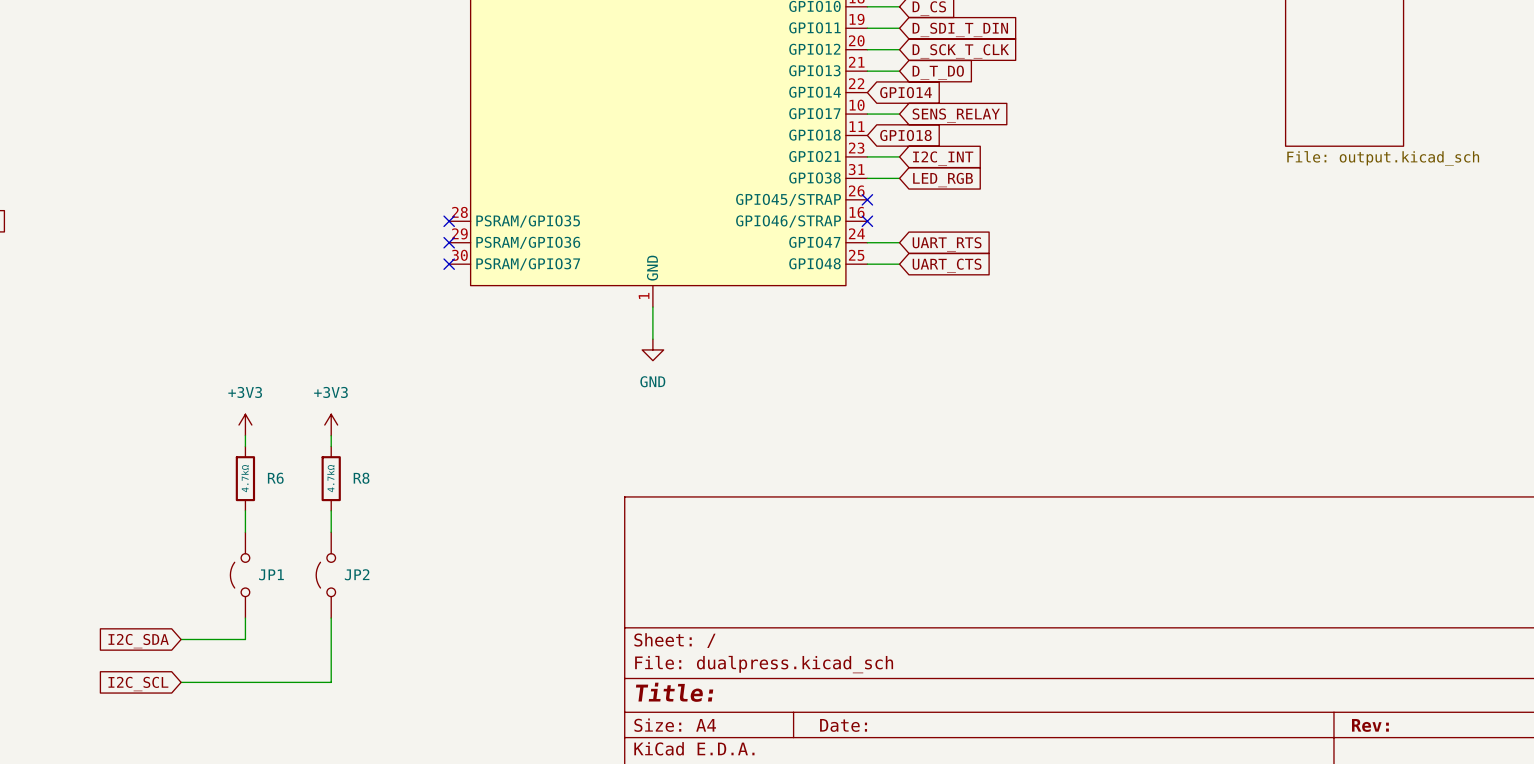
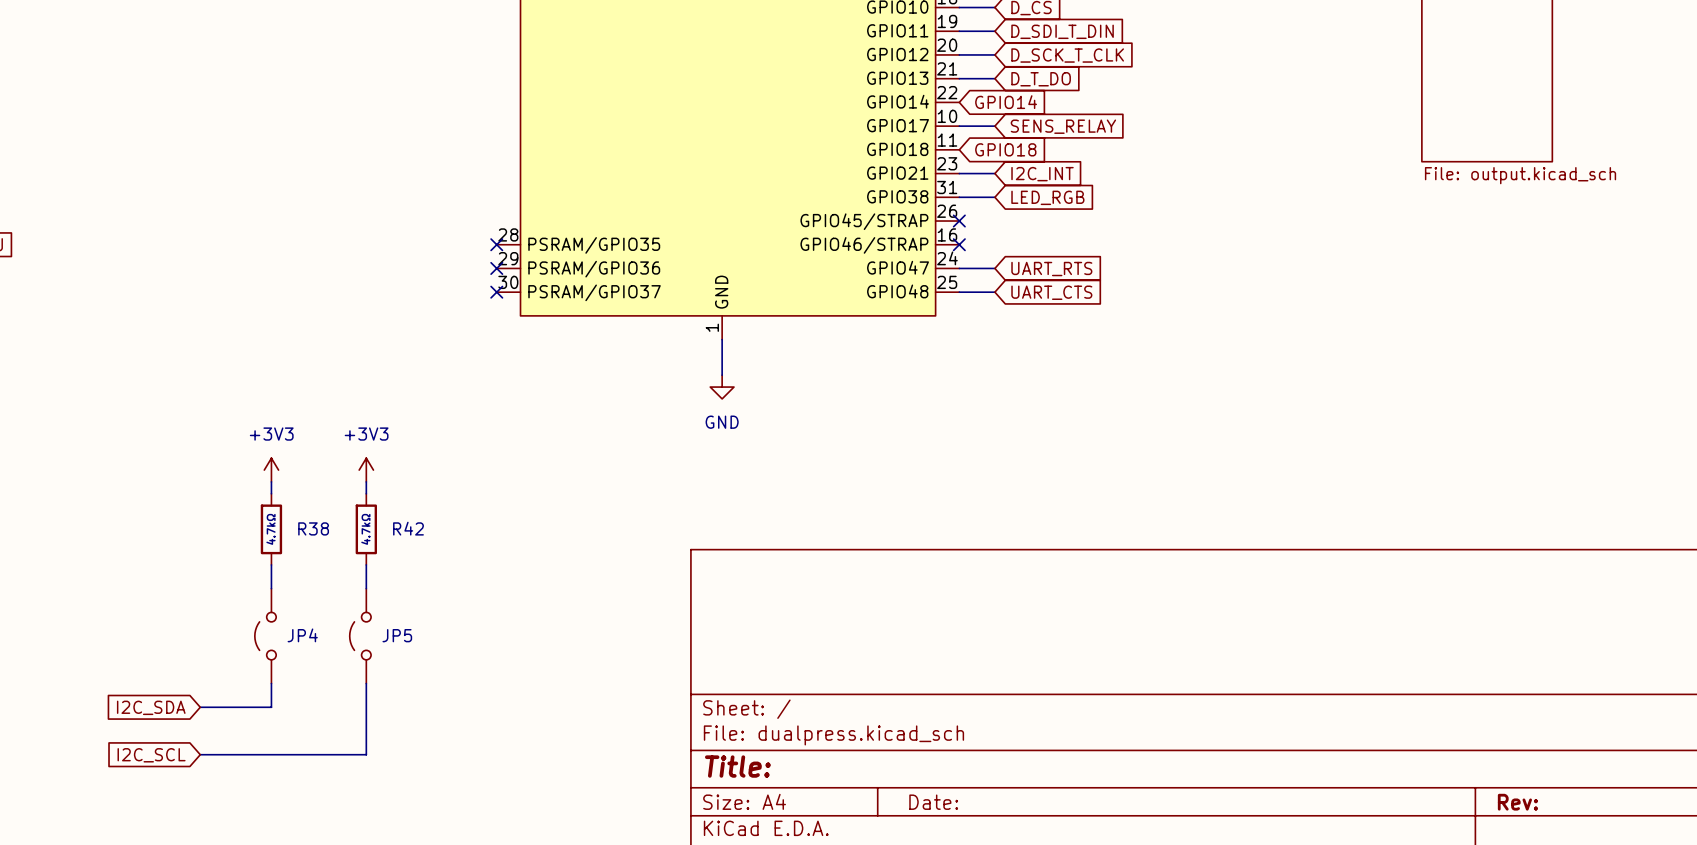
R6 name: R6 (275, 478) -> R38 (313, 528)
R8 name: R8 (361, 478) -> R42 (408, 528)
JP1 name: JP1 (271, 574) -> JP4 (302, 635)
JP2 name: JP2 (357, 574) -> JP5 (397, 635)

